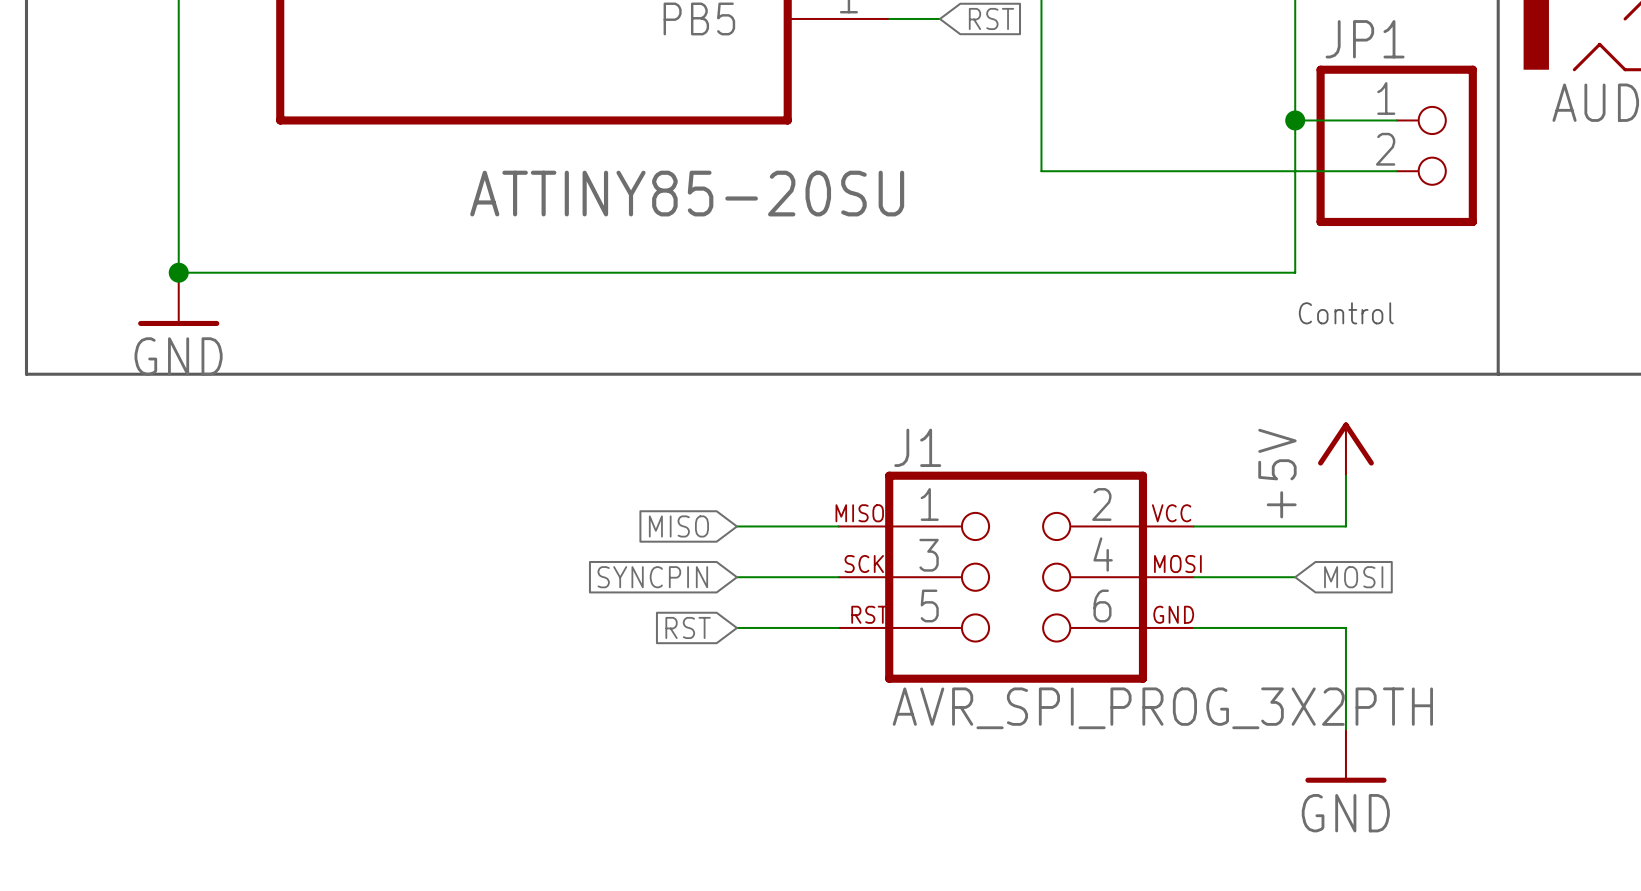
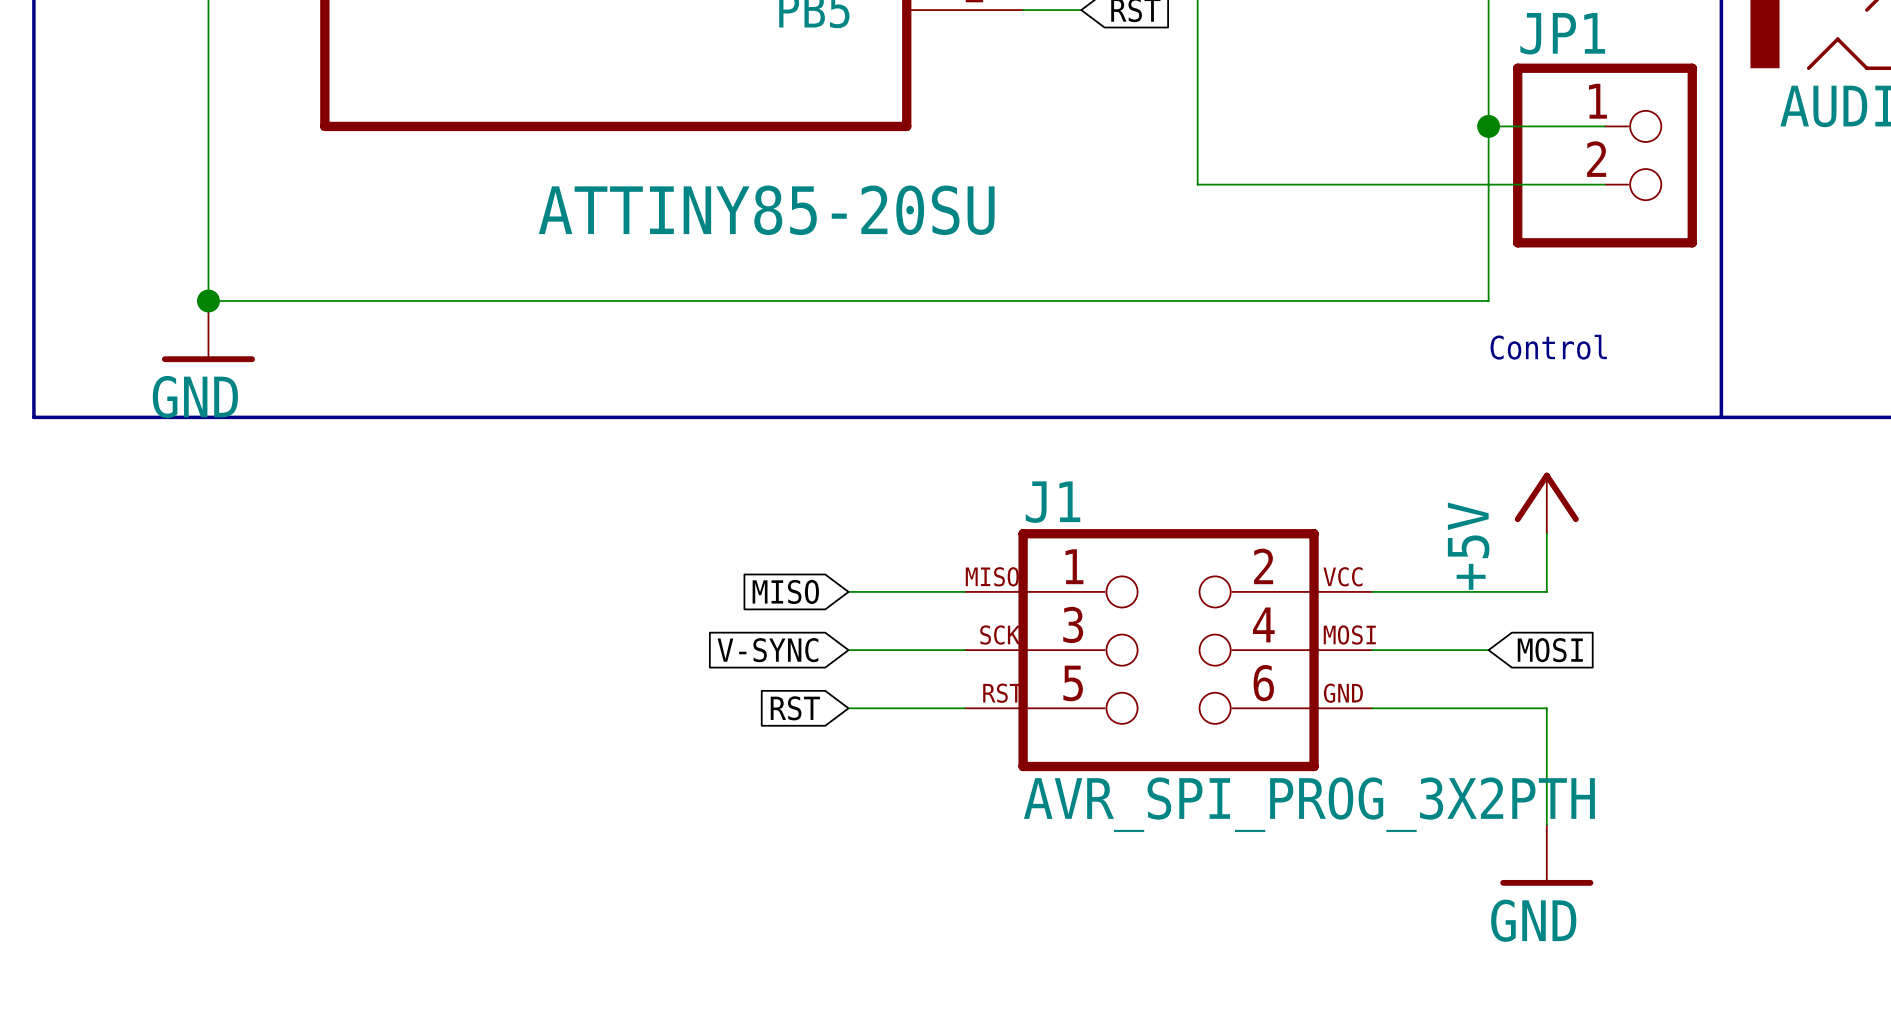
global label: SYNCPIN (652, 577) -> V-SYNC (767, 650)

